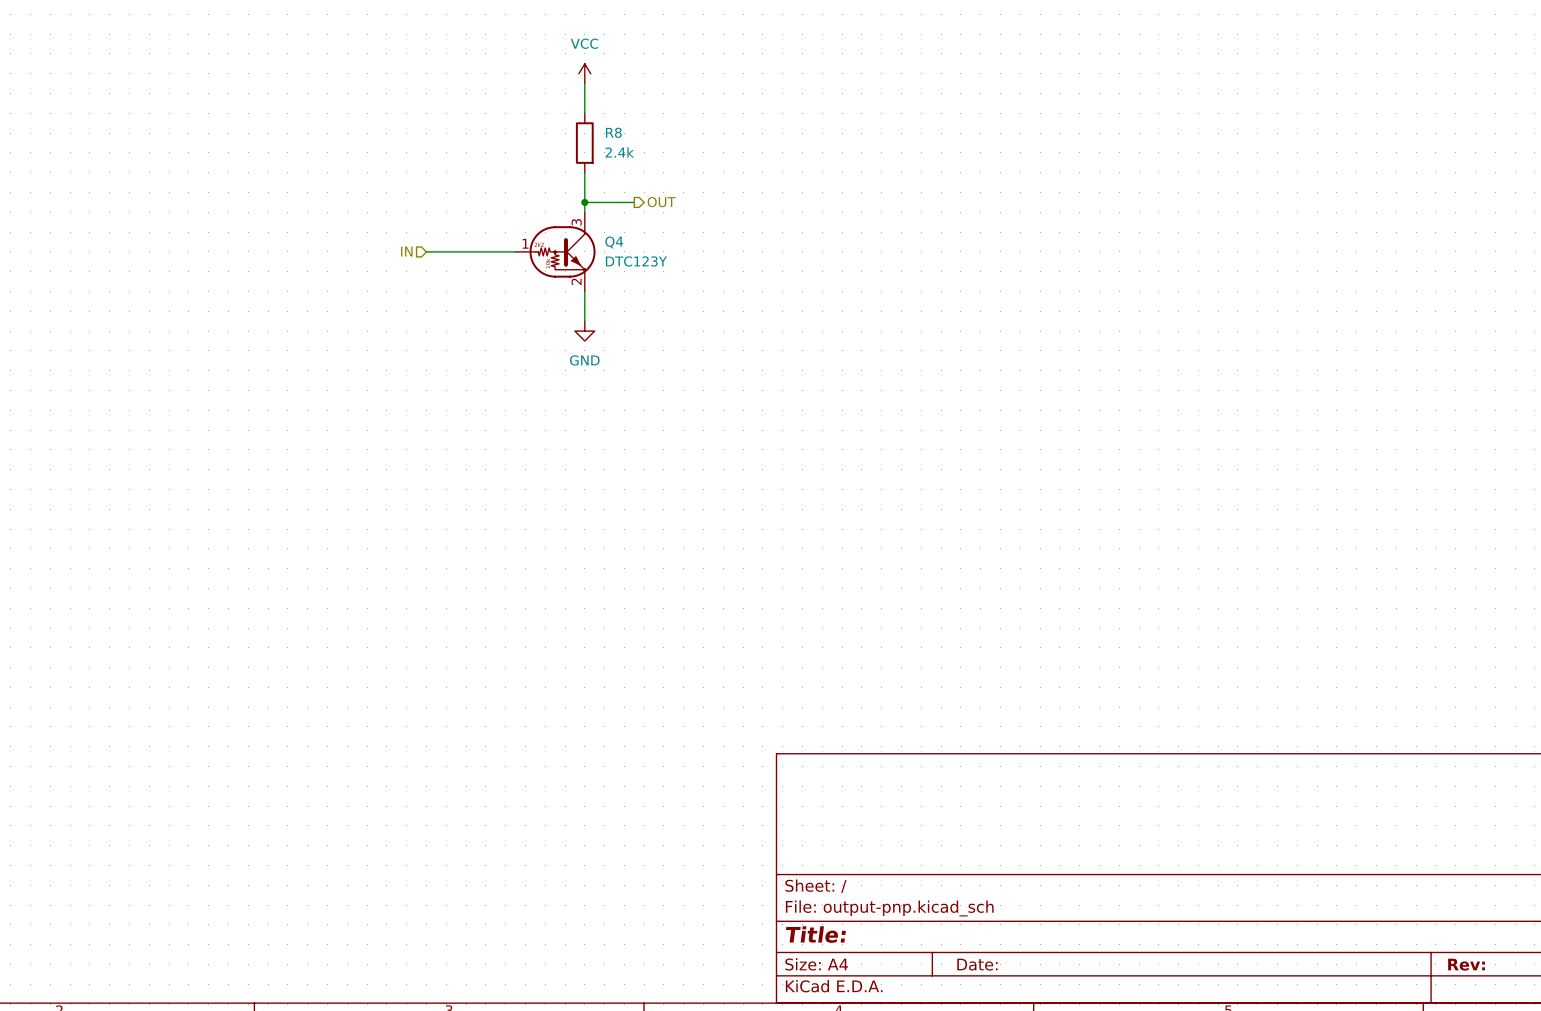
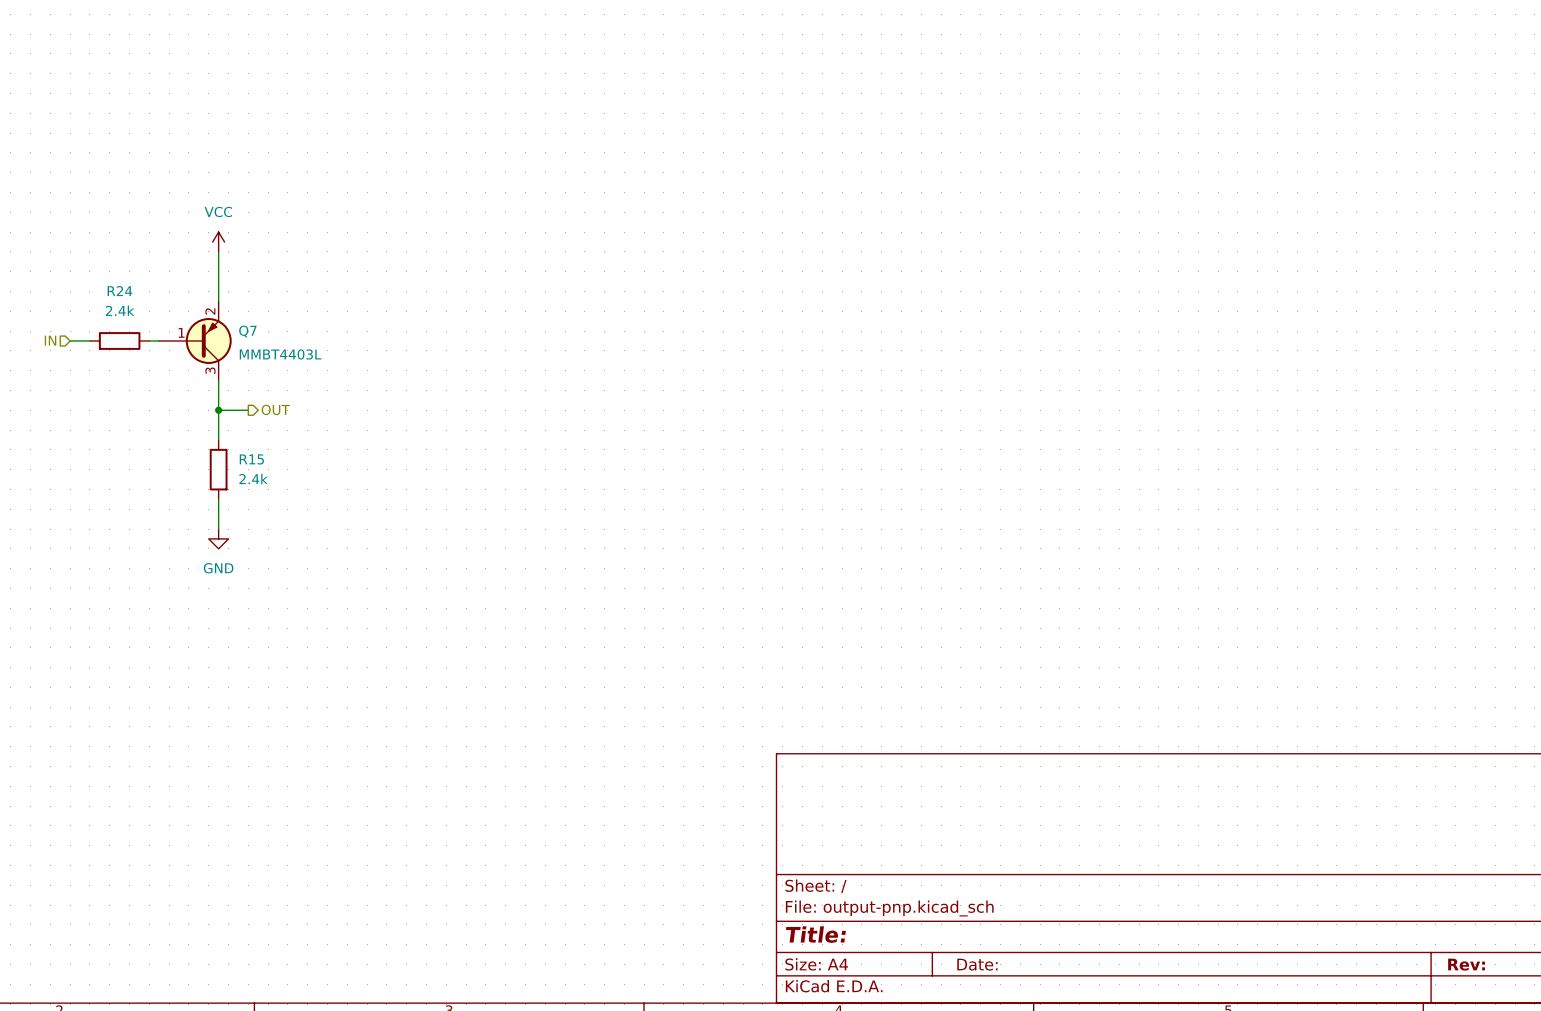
power symbol: VCC (584, 73) -> none
wire: (584, 83) (584, 113) -> none
R8: 2.4k (584, 143) -> none
wire: (584, 172) (584, 212) -> none
wire: (584, 202) (634, 202) -> none
junction: (584, 202) -> none
hierarchical label: OUT (661, 202) -> none
power symbol: none -> VCC (218, 242)
wire: none -> (218, 251) (218, 301)
hierarchical label: IN (406, 251) -> none
wire: (426, 251) (515, 251) -> none
Q4: DTC123Y (555, 251) -> none
wire: (584, 291) (584, 321) -> none
power symbol: GND (584, 331) -> none
hierarchical label: none -> IN (50, 340)
wire: none -> (70, 340) (89, 340)
R24: none -> 2.4k (119, 340)
wire: none -> (149, 340) (159, 340)
Q7: none -> (195, 340)
wire: none -> (218, 380) (218, 439)
hierarchical label: none -> OUT (275, 409)
wire: none -> (218, 410) (248, 410)
junction: none -> (218, 410)
R15: none -> 2.4k (218, 469)
wire: none -> (218, 499) (218, 529)
power symbol: none -> GND (218, 538)

